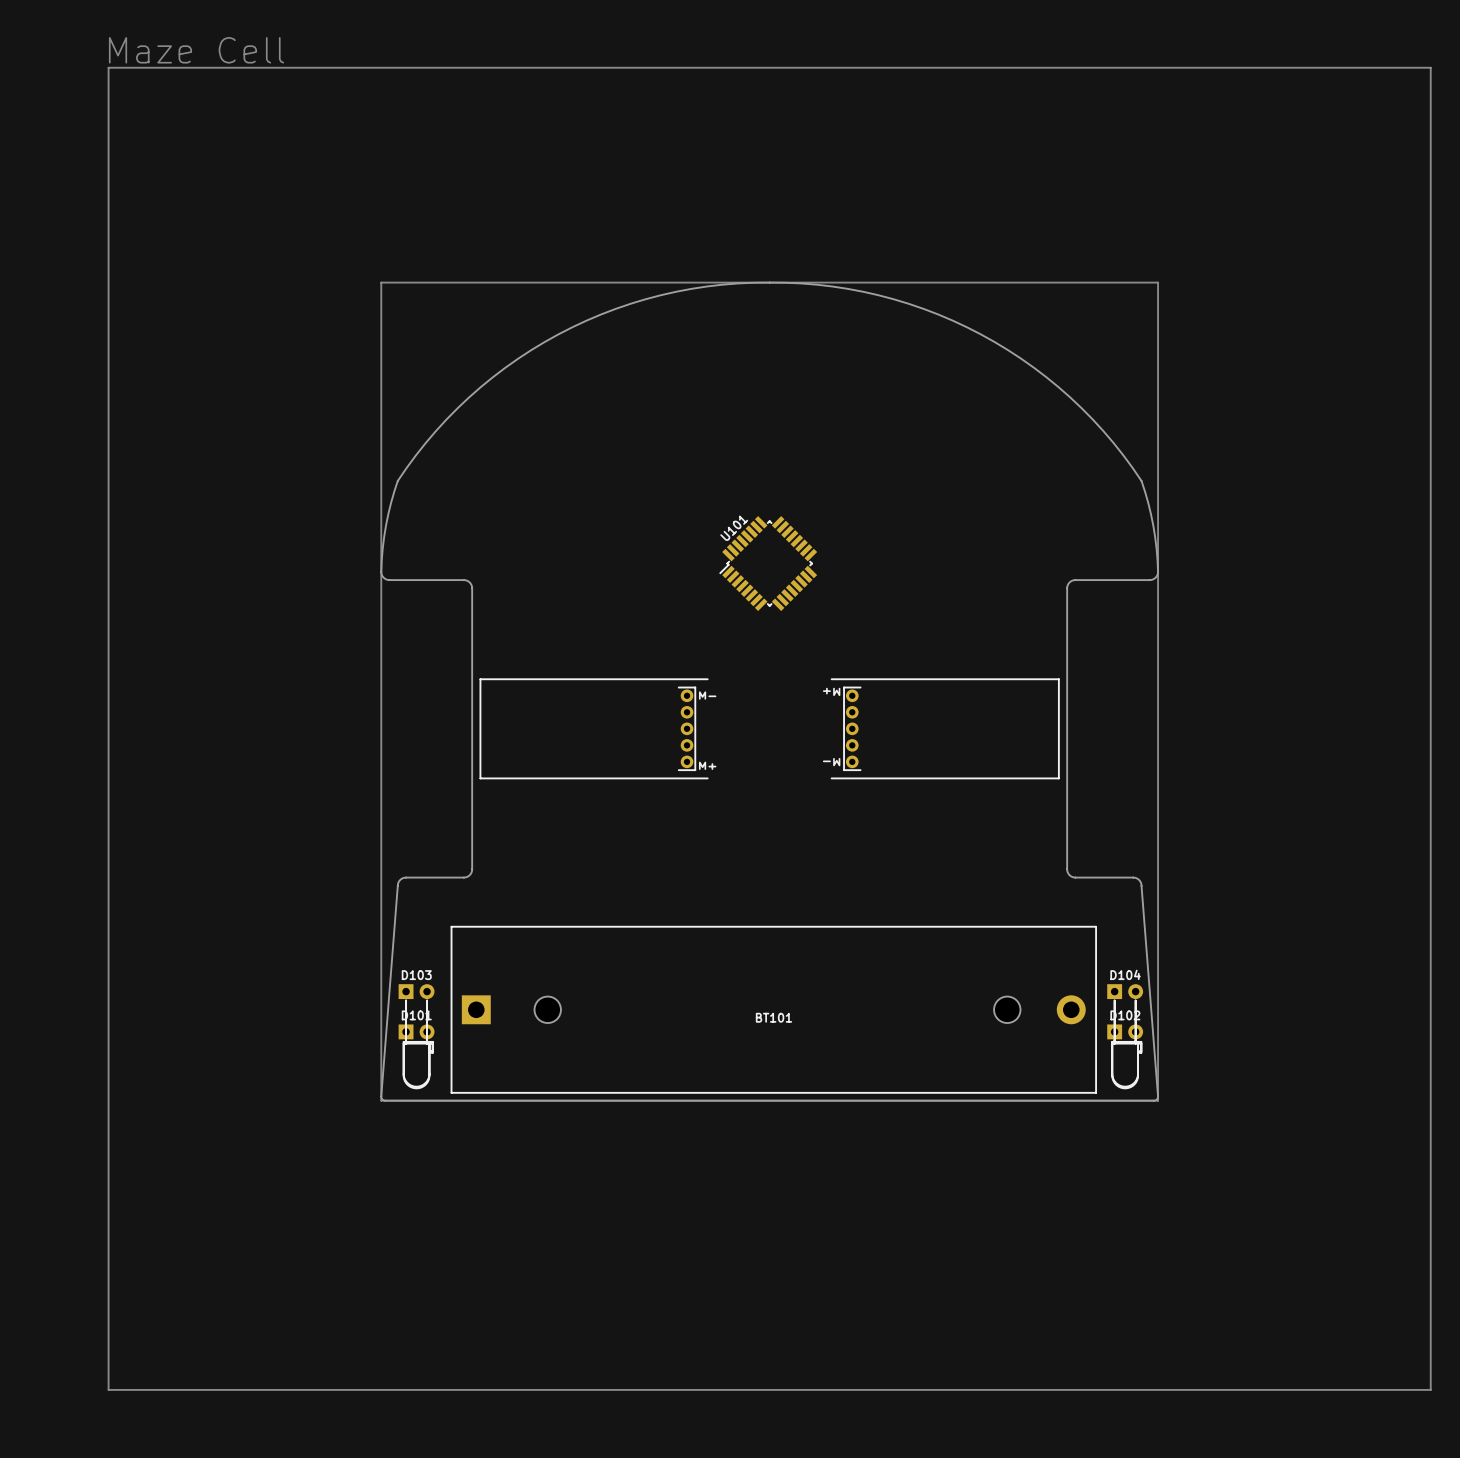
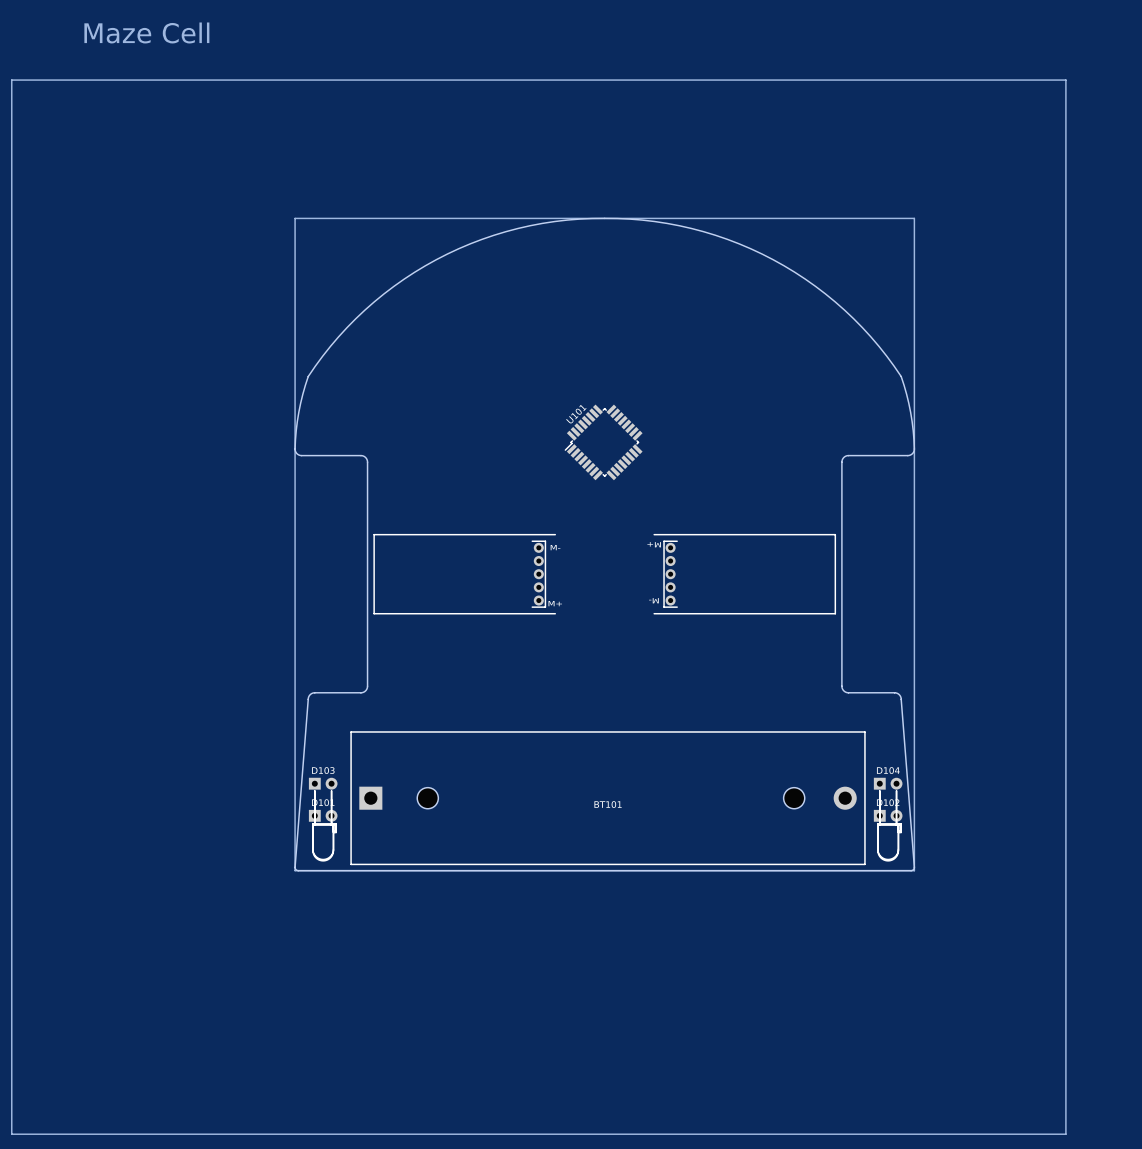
line: (108, 67) (108, 1389) (1430, 1389) (1430, 67) (108, 67) -> (11, 80) (11, 1134) (1065, 1134) (1065, 80) (11, 80)

